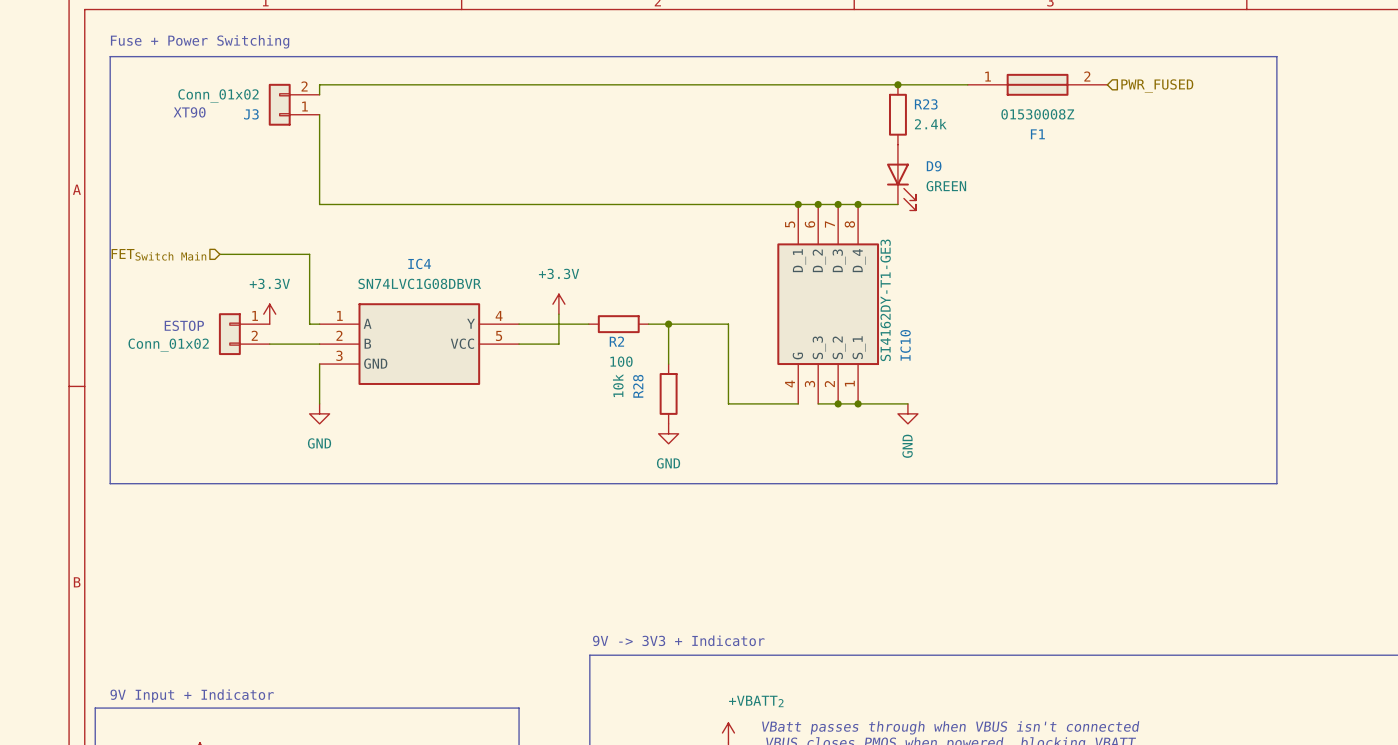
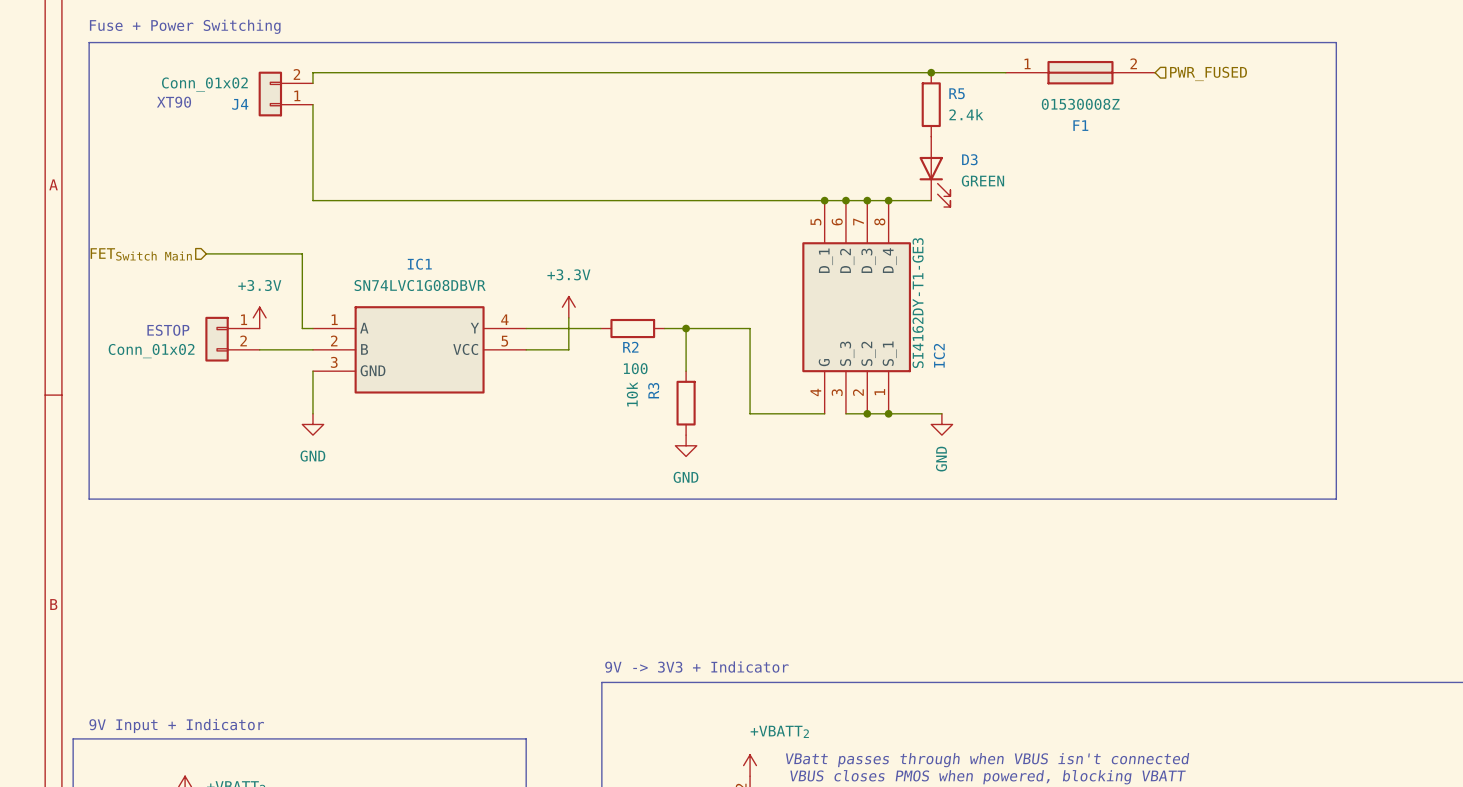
R23 name: R23 (926, 104) -> R5 (957, 93)
J3 name: J3 (251, 114) -> J4 (240, 104)
D9 name: D9 (934, 166) -> D3 (969, 159)
IC4 name: IC4 (419, 263) -> IC1 (419, 264)
IC10 name: IC10 (905, 345) -> IC2 (939, 355)
R28 name: R28 (638, 386) -> R3 (653, 390)

